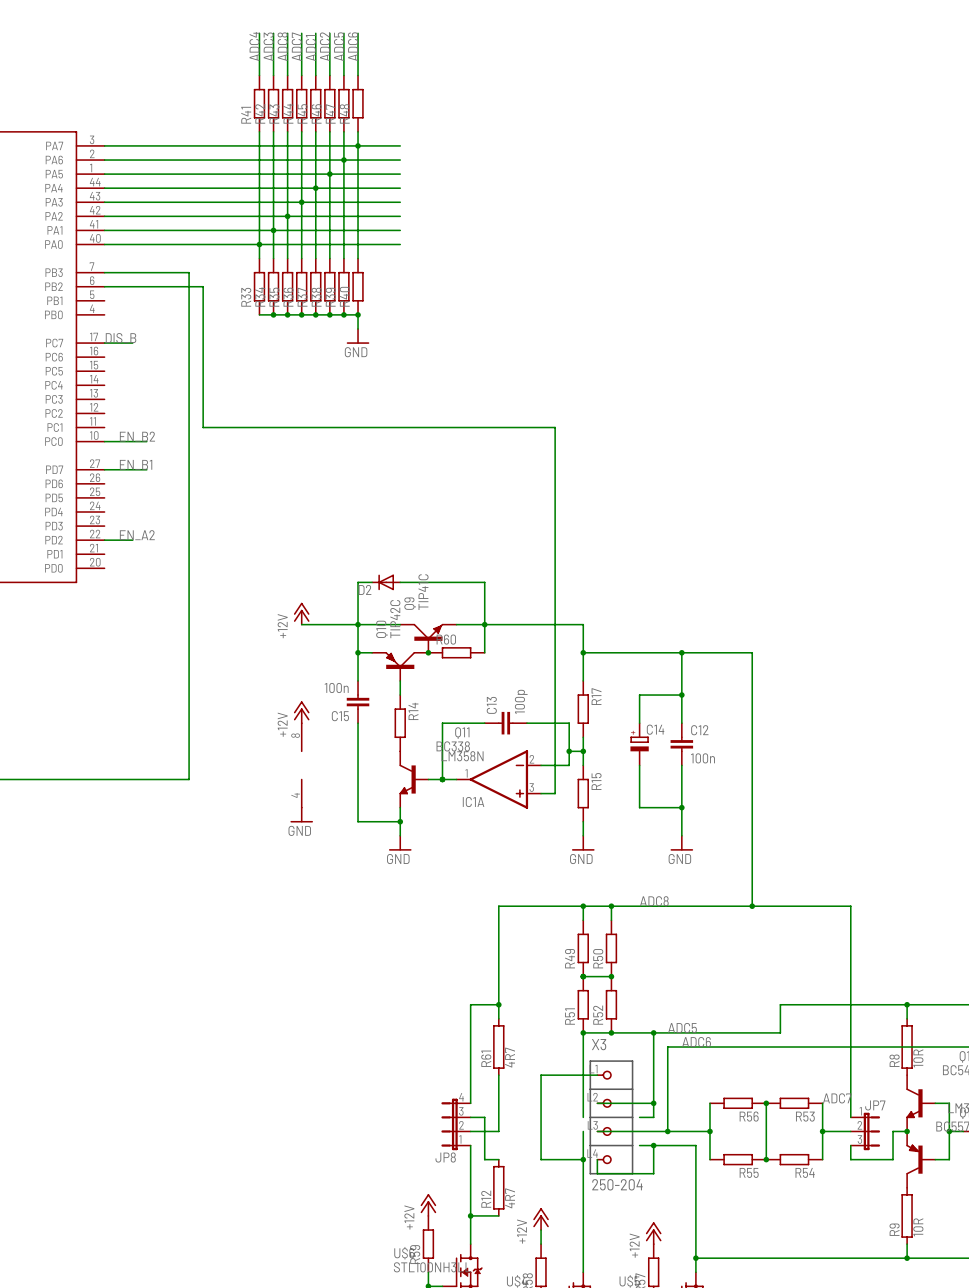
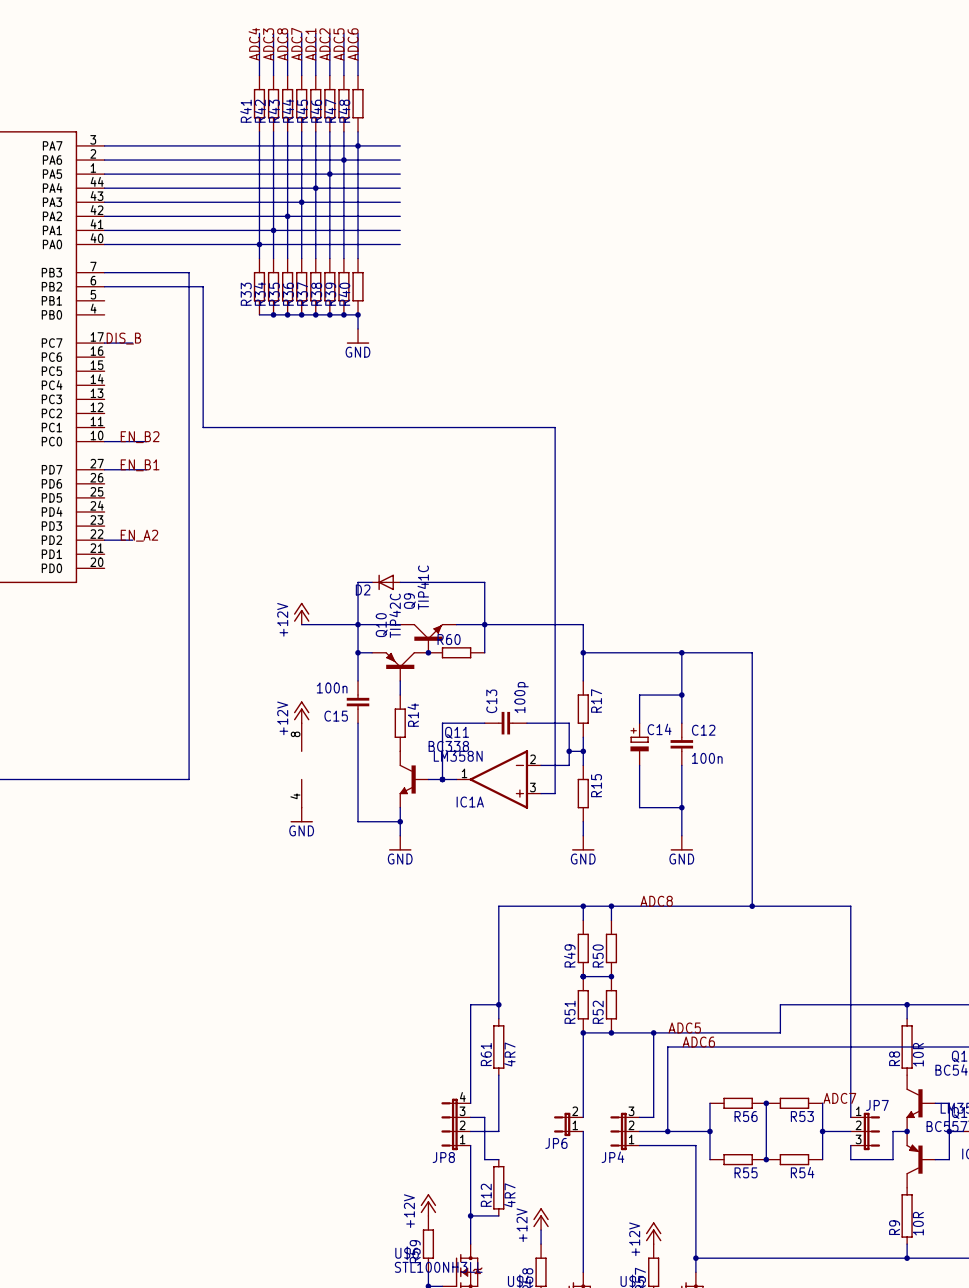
wire: (597, 1075) (541, 1075) (541, 1159) (583, 1159) -> none
wire: (597, 1103) (653, 1103) -> none
junction: (653, 1103) -> none
X3: 250-204 (611, 1117) -> none
JP6: none -> (568, 1124)
JP4: none -> (624, 1131)
wire: (653, 1145) (653, 1173) (597, 1173) (597, 1159) -> none
junction: (653, 1145) -> none
junction: (583, 1159) -> none

